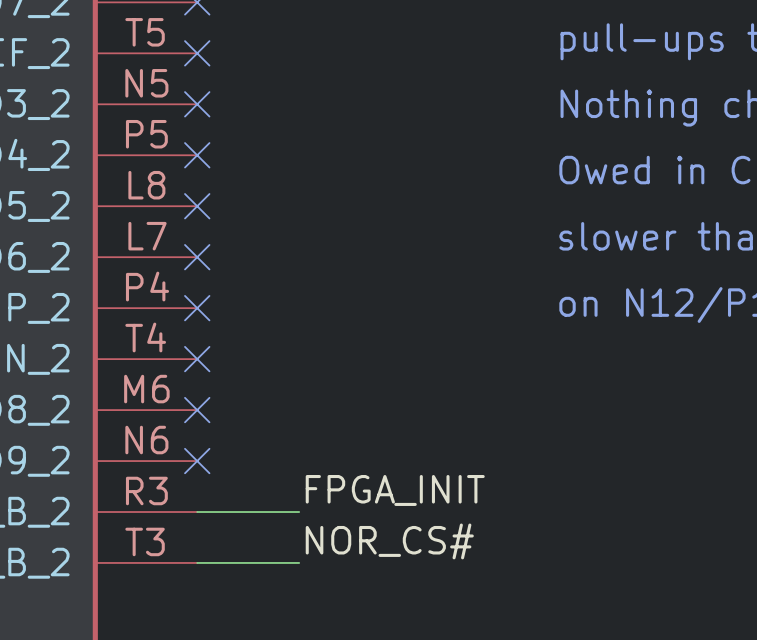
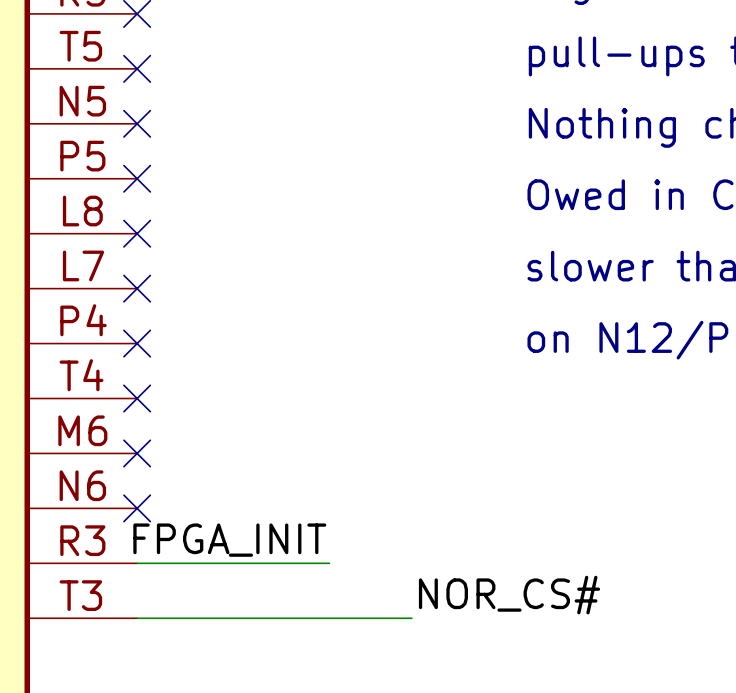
label position: FPGA_INIT (395, 490) -> FPGA_INIT (229, 540)
wire: none -> (247, 563) (329, 563)
label position: NOR_CS# (389, 541) -> NOR_CS# (509, 595)
wire: none -> (247, 618) (411, 618)

